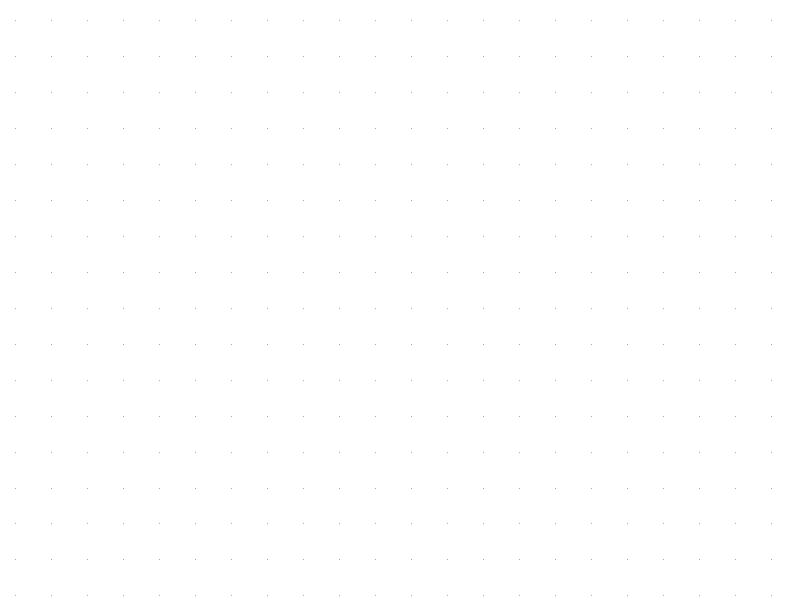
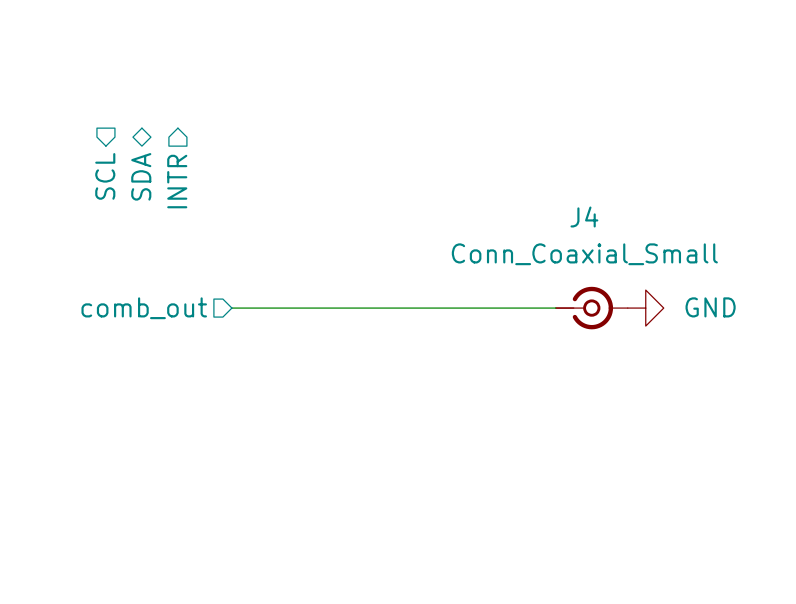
sheet pin: none -> SCL (105, 176)
sheet pin: none -> SDA (141, 176)
sheet pin: none -> INTR (177, 181)
sheet pin: none -> comb_out (144, 308)
wire: none -> (231, 308) (555, 308)
J4: none -> Conn_Coaxial_Small (591, 308)
power symbol: none -> GND (645, 308)

